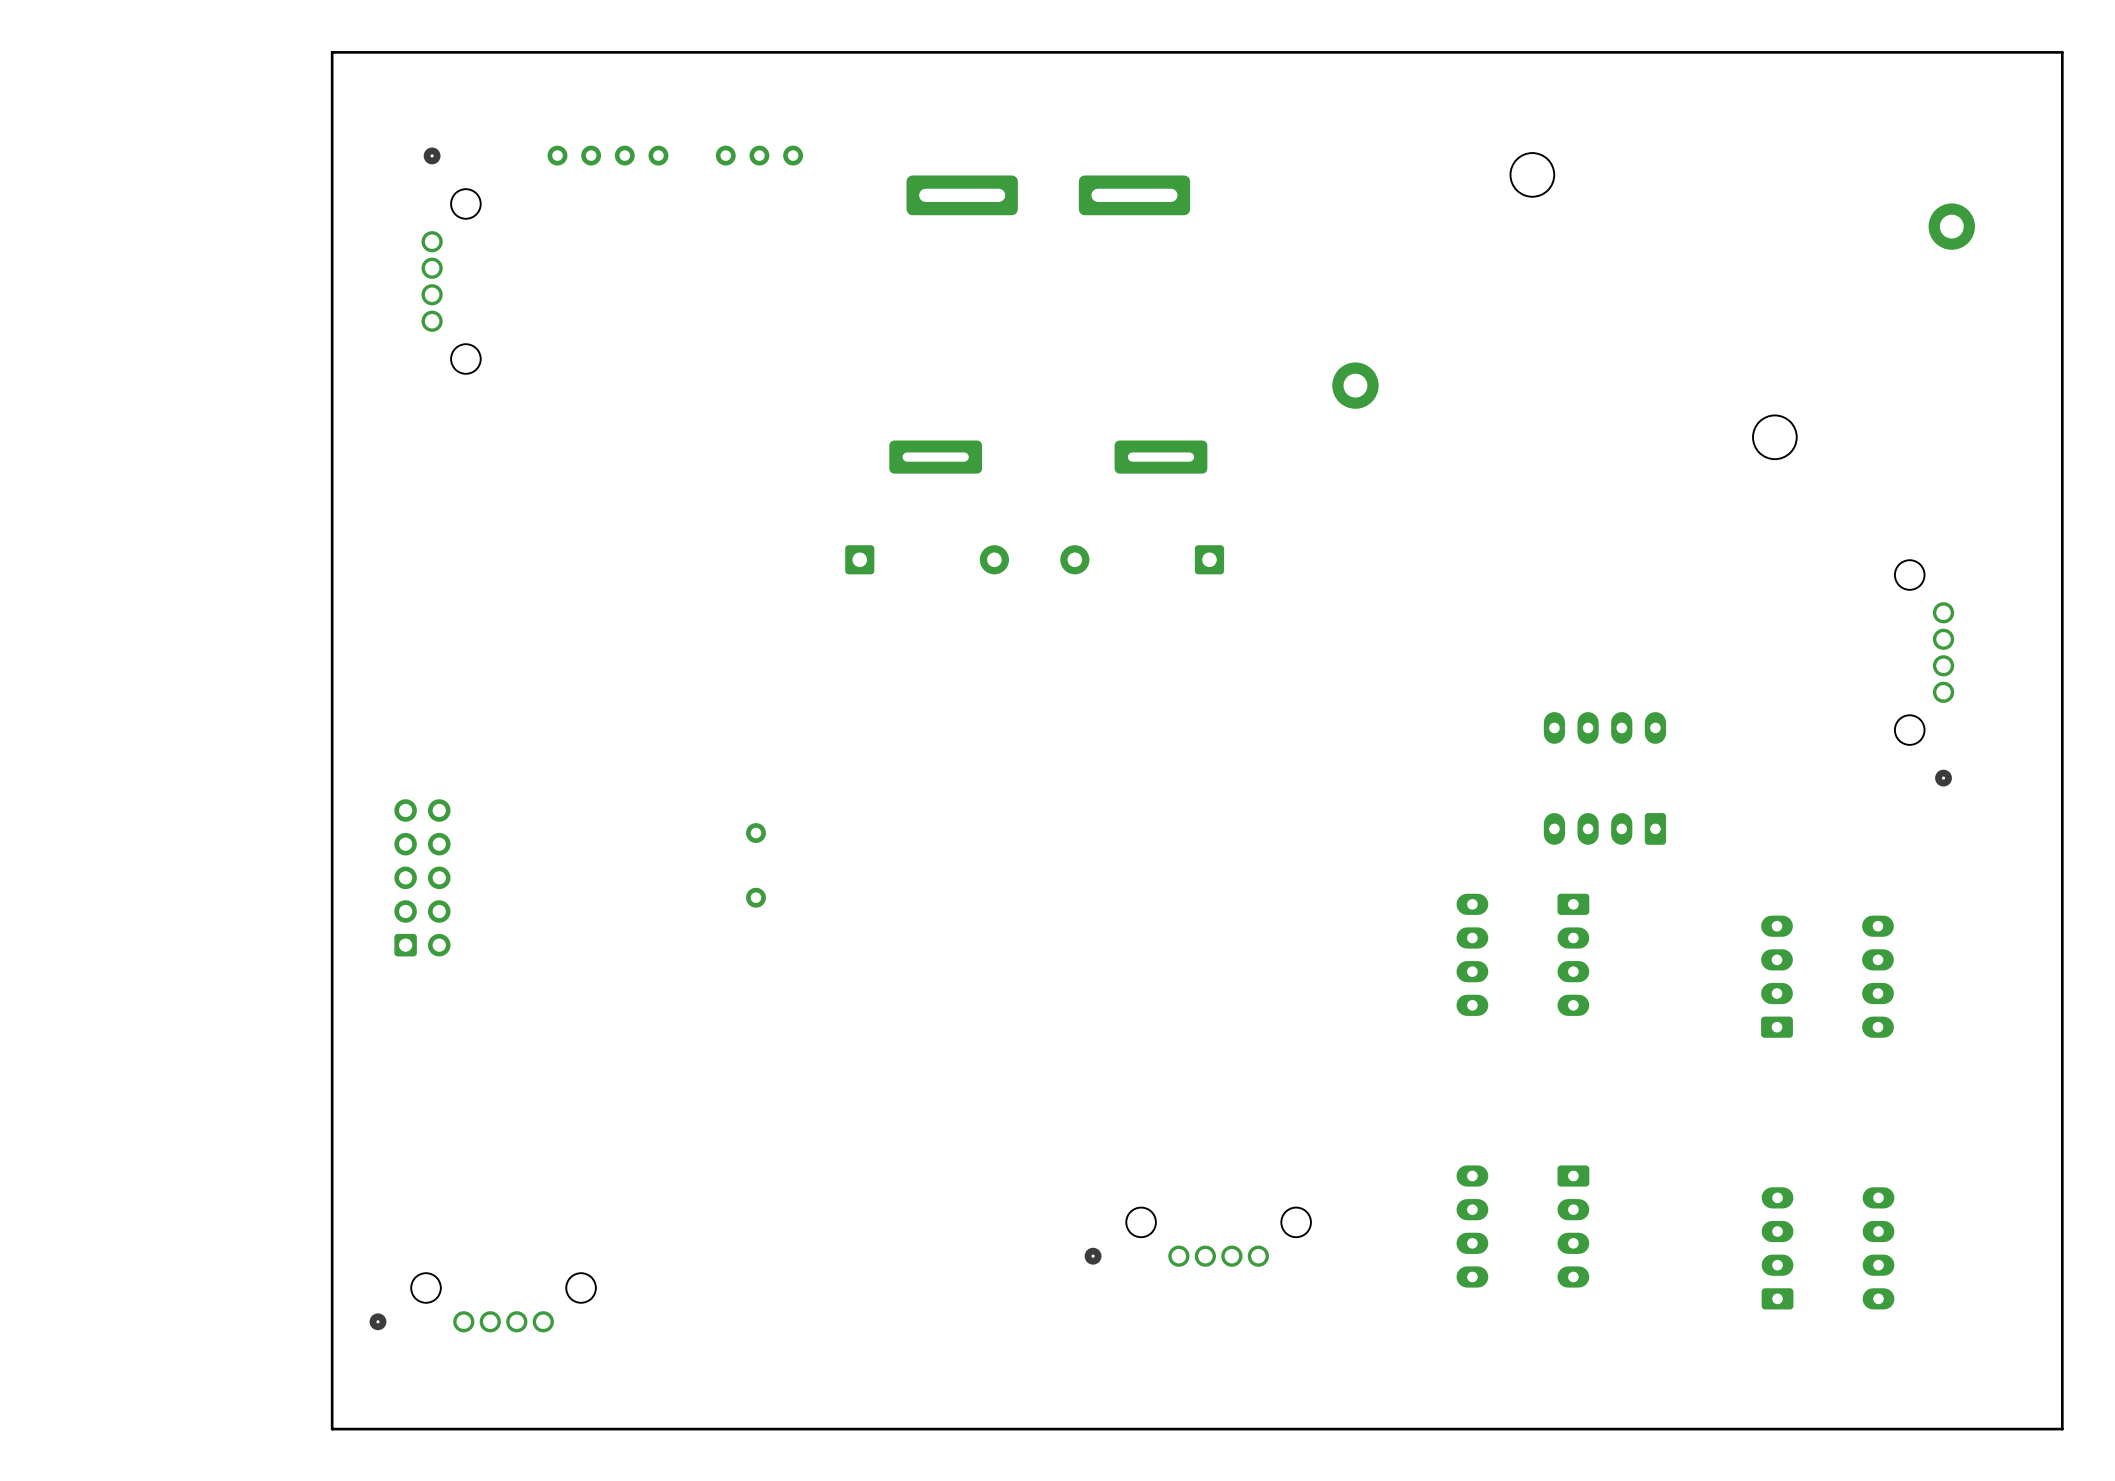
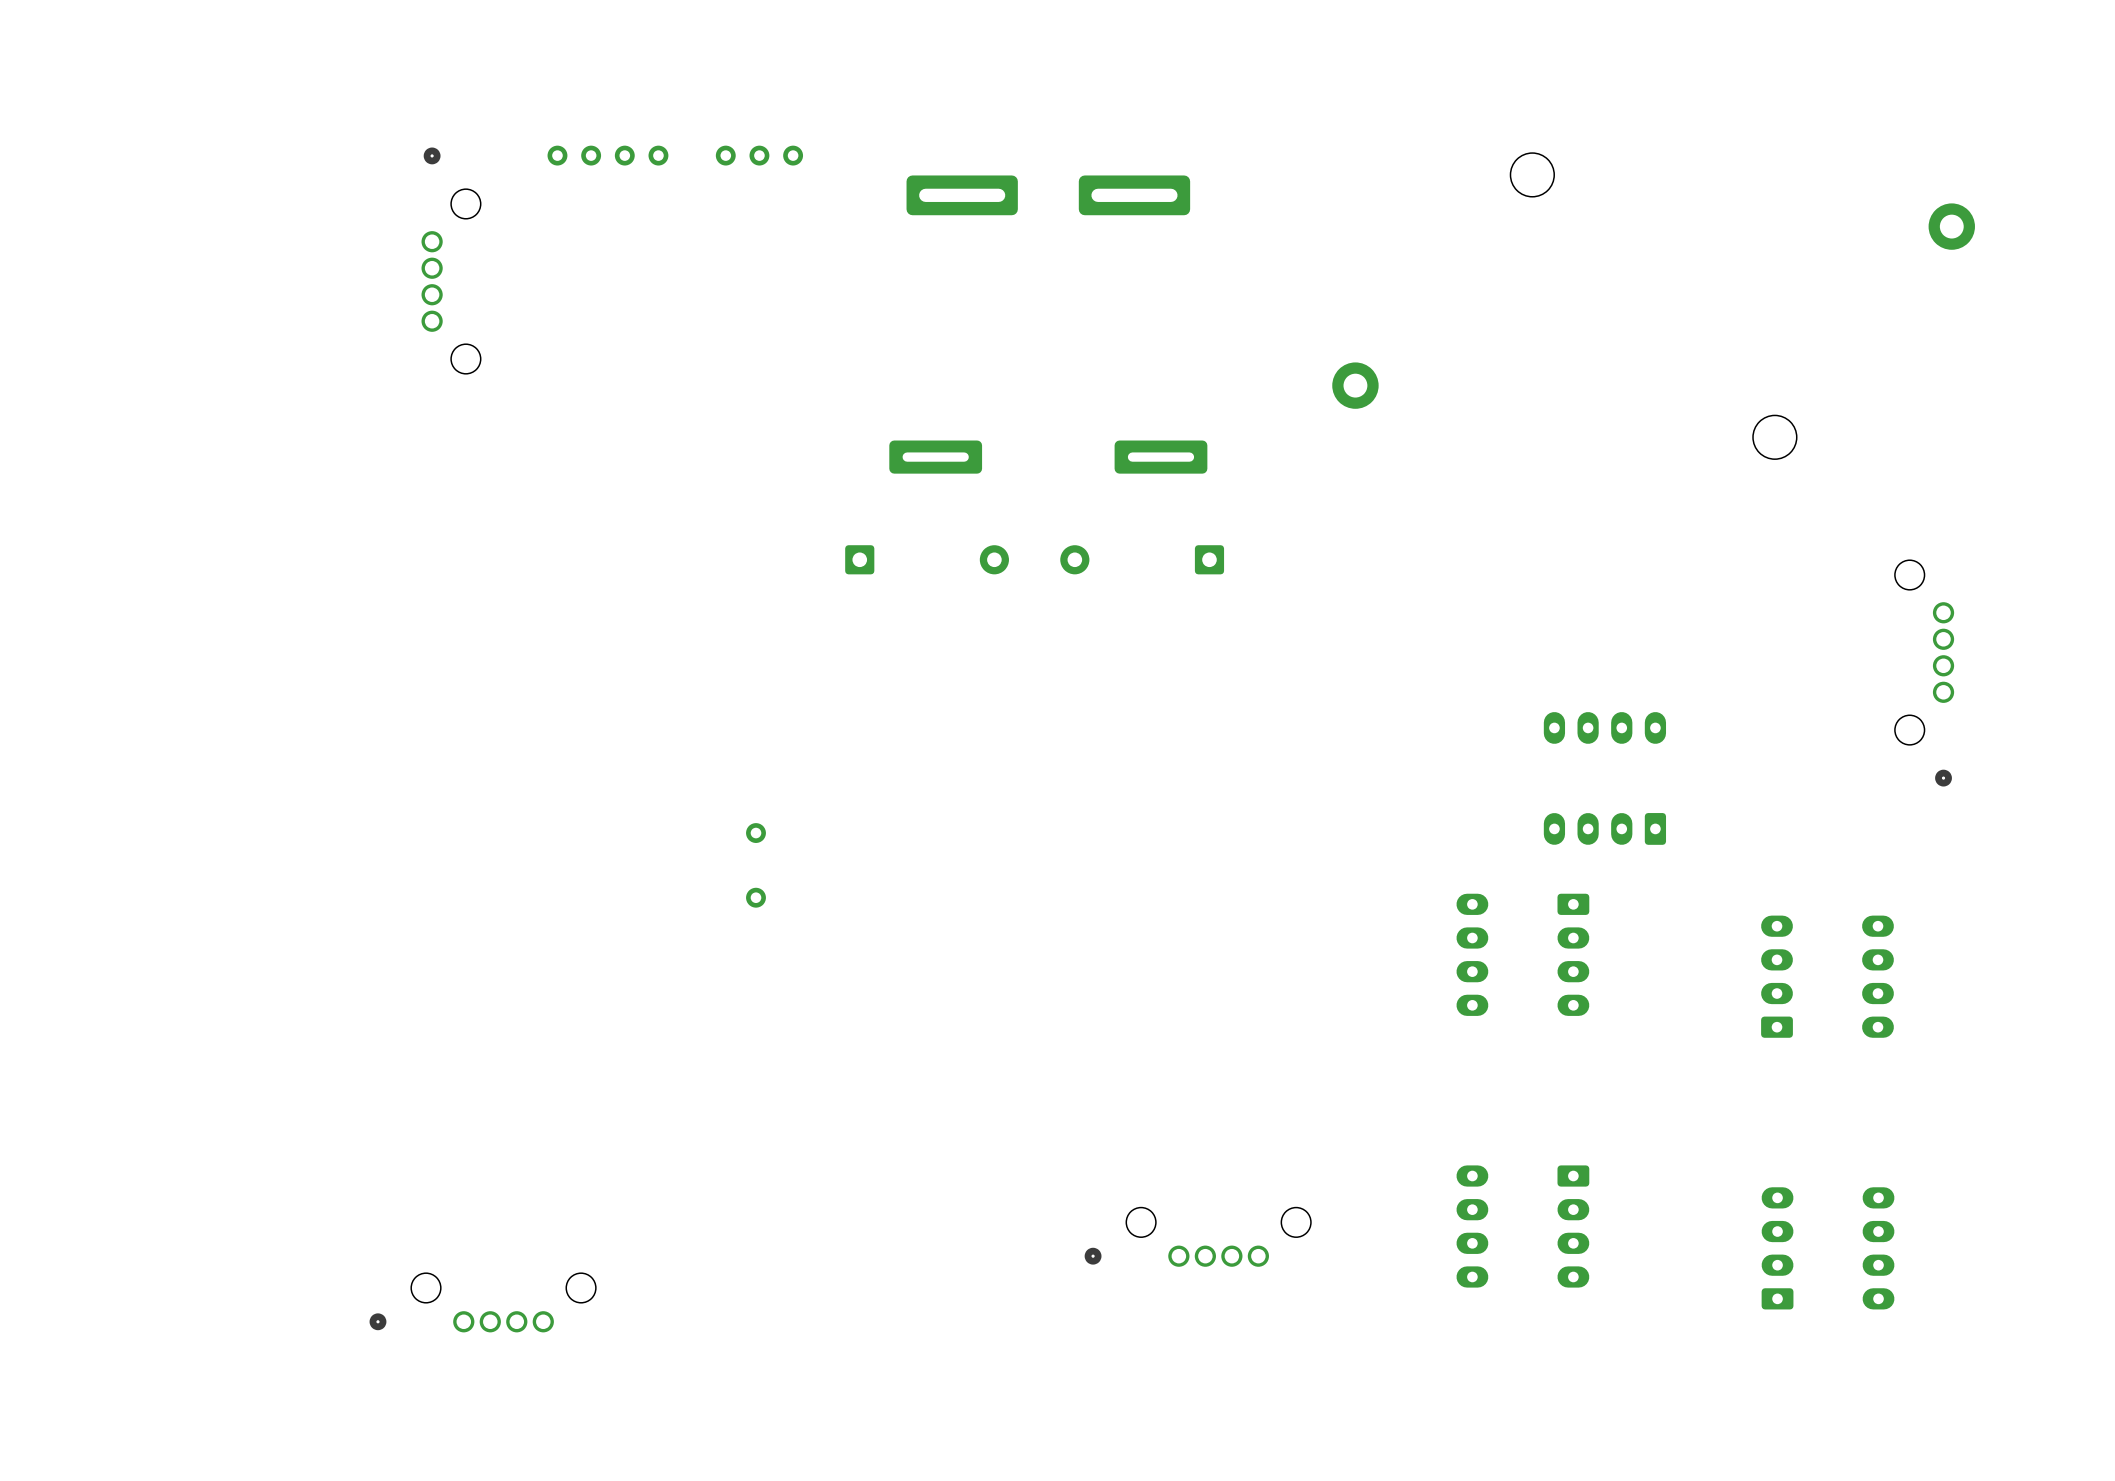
board edge: (2062, 52) (332, 52) (332, 1429) (2062, 1429) (2062, 52) -> none
part: (422, 877) -> none

